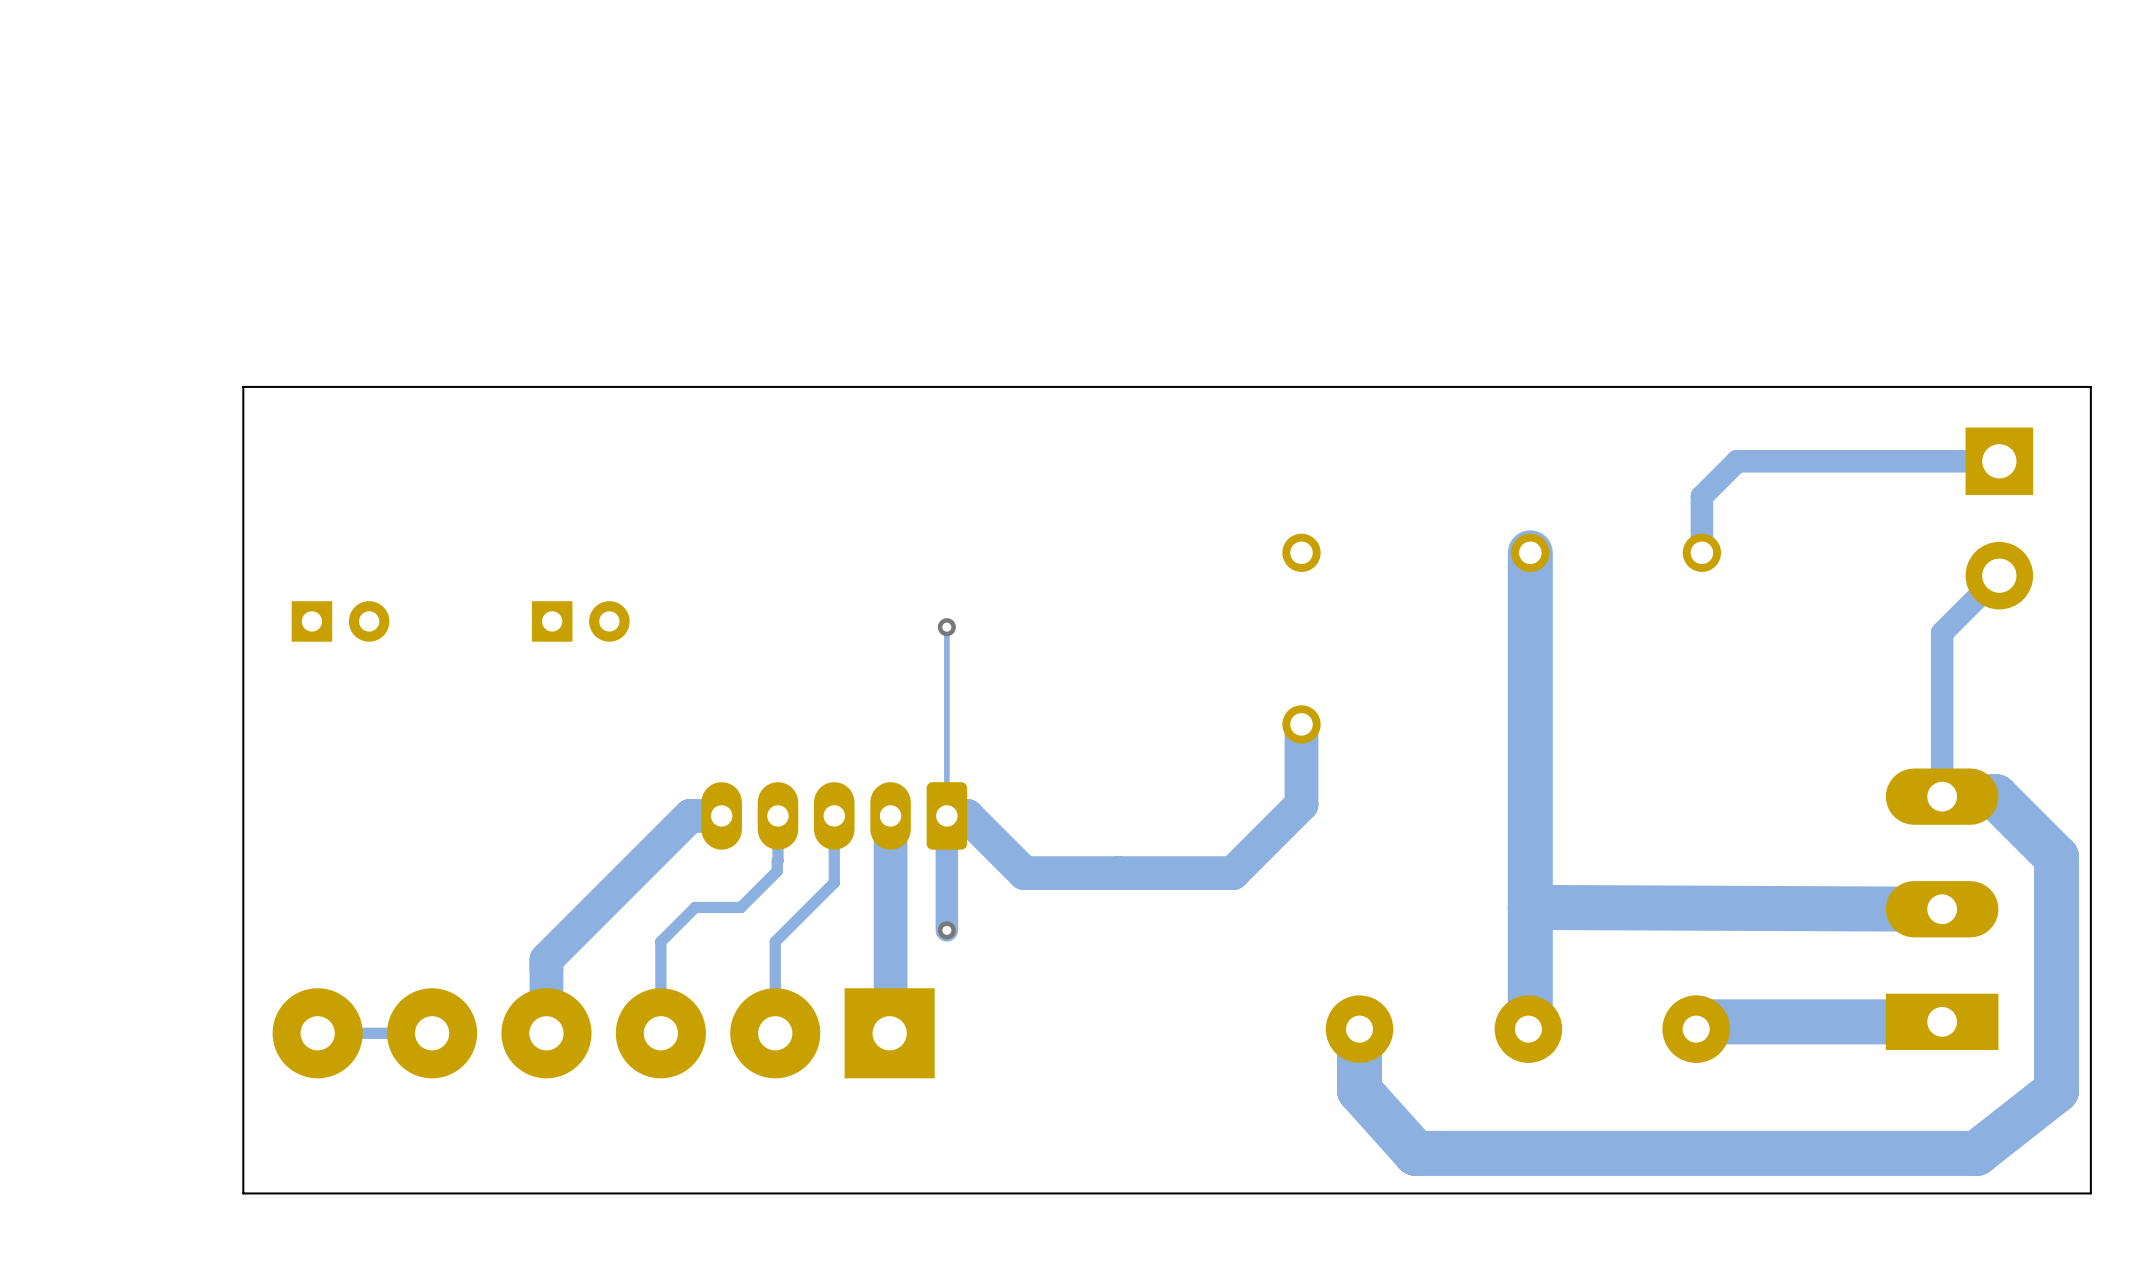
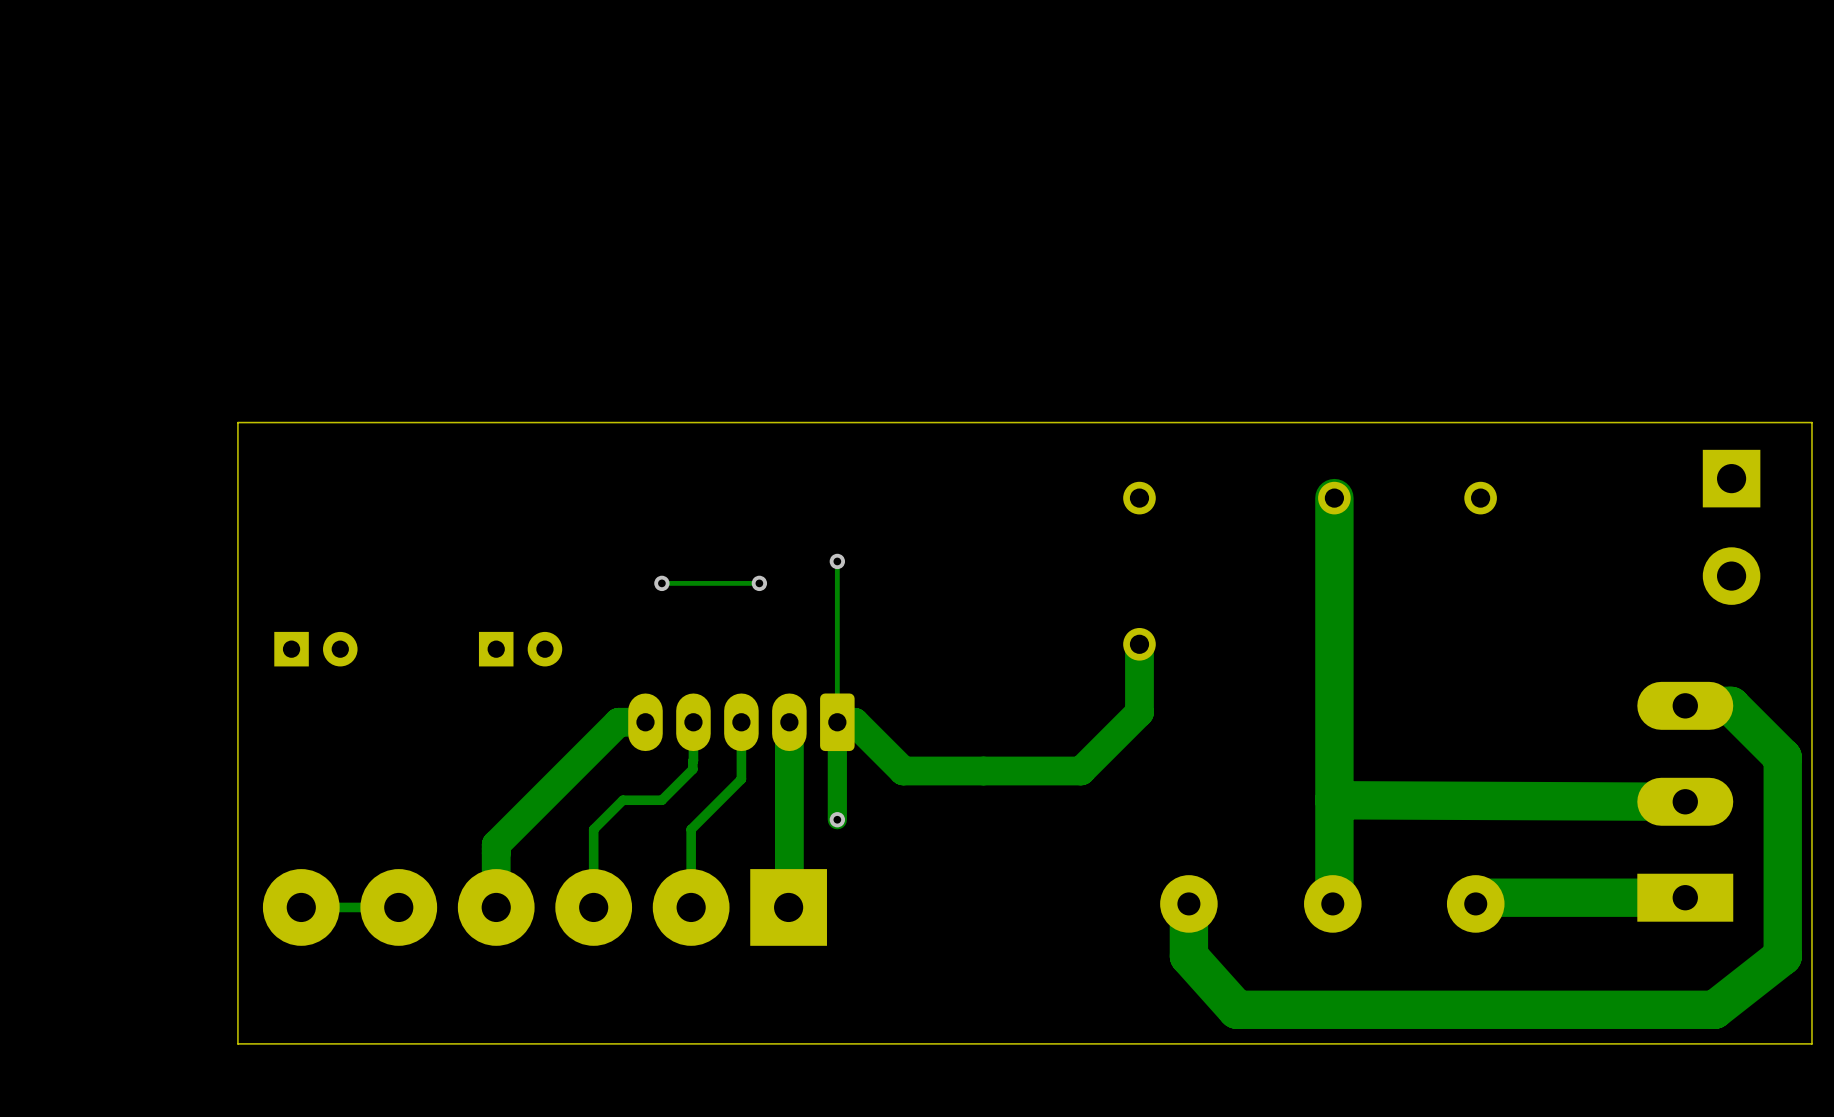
track: (1999, 461) (1737, 461) (1701, 496) (1701, 552) -> none
board edge: (2090, 464) (2090, 386) (243, 386) (243, 464) -> (1811, 422) (237, 422)
part position: (1999, 518) -> (1731, 527)
track: (1999, 575) (1942, 632) (1942, 796) -> none
part position: (340, 621) -> (315, 649)
part position: (580, 621) -> (520, 649)
via: none -> (661, 583)
track: none -> (759, 583) (661, 583)
via: none -> (759, 583)

